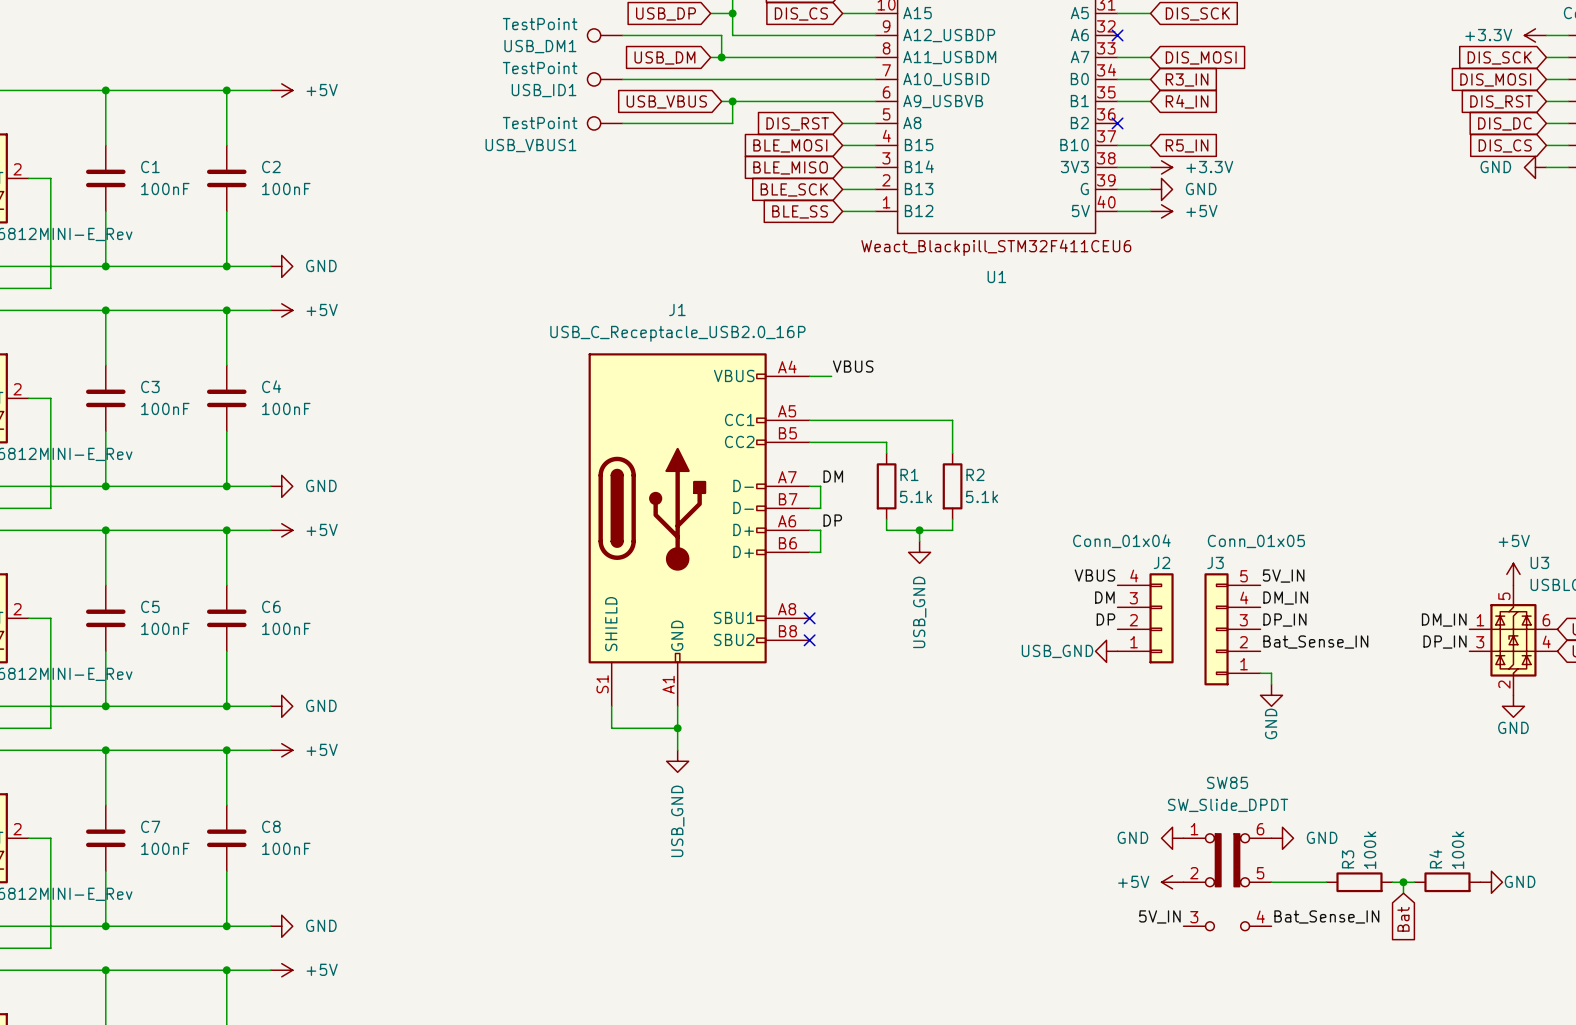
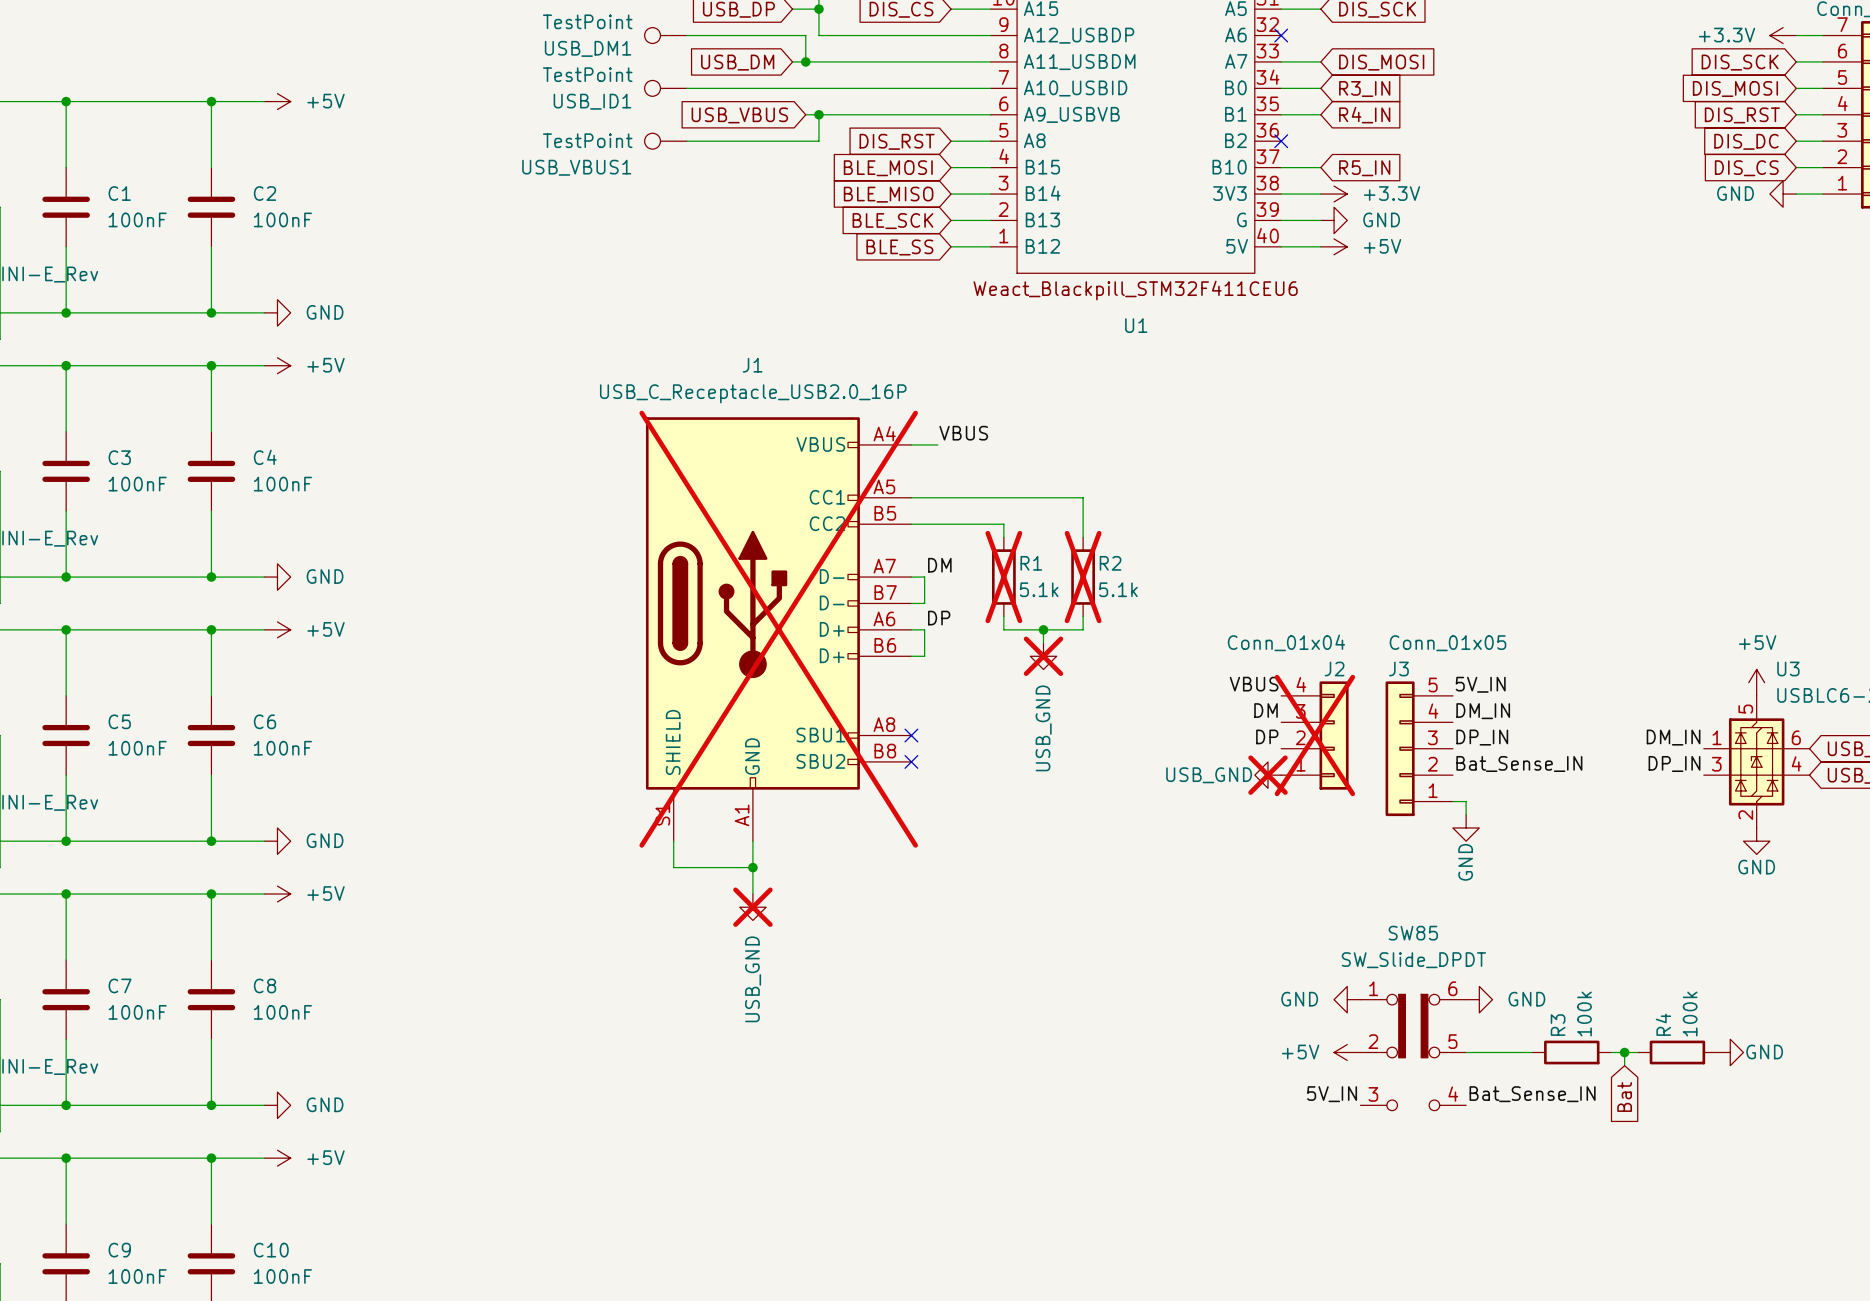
R1 do-not-place cross: none -> (1003, 577)
R2 do-not-place cross: none -> (1083, 577)
J1 do-not-place cross: none -> (778, 629)
power symbol do-not-place cross: none -> (1043, 656)
J2 do-not-place cross: none -> (1314, 735)
power symbol do-not-place cross: none -> (1268, 775)
power symbol do-not-place cross: none -> (752, 907)

